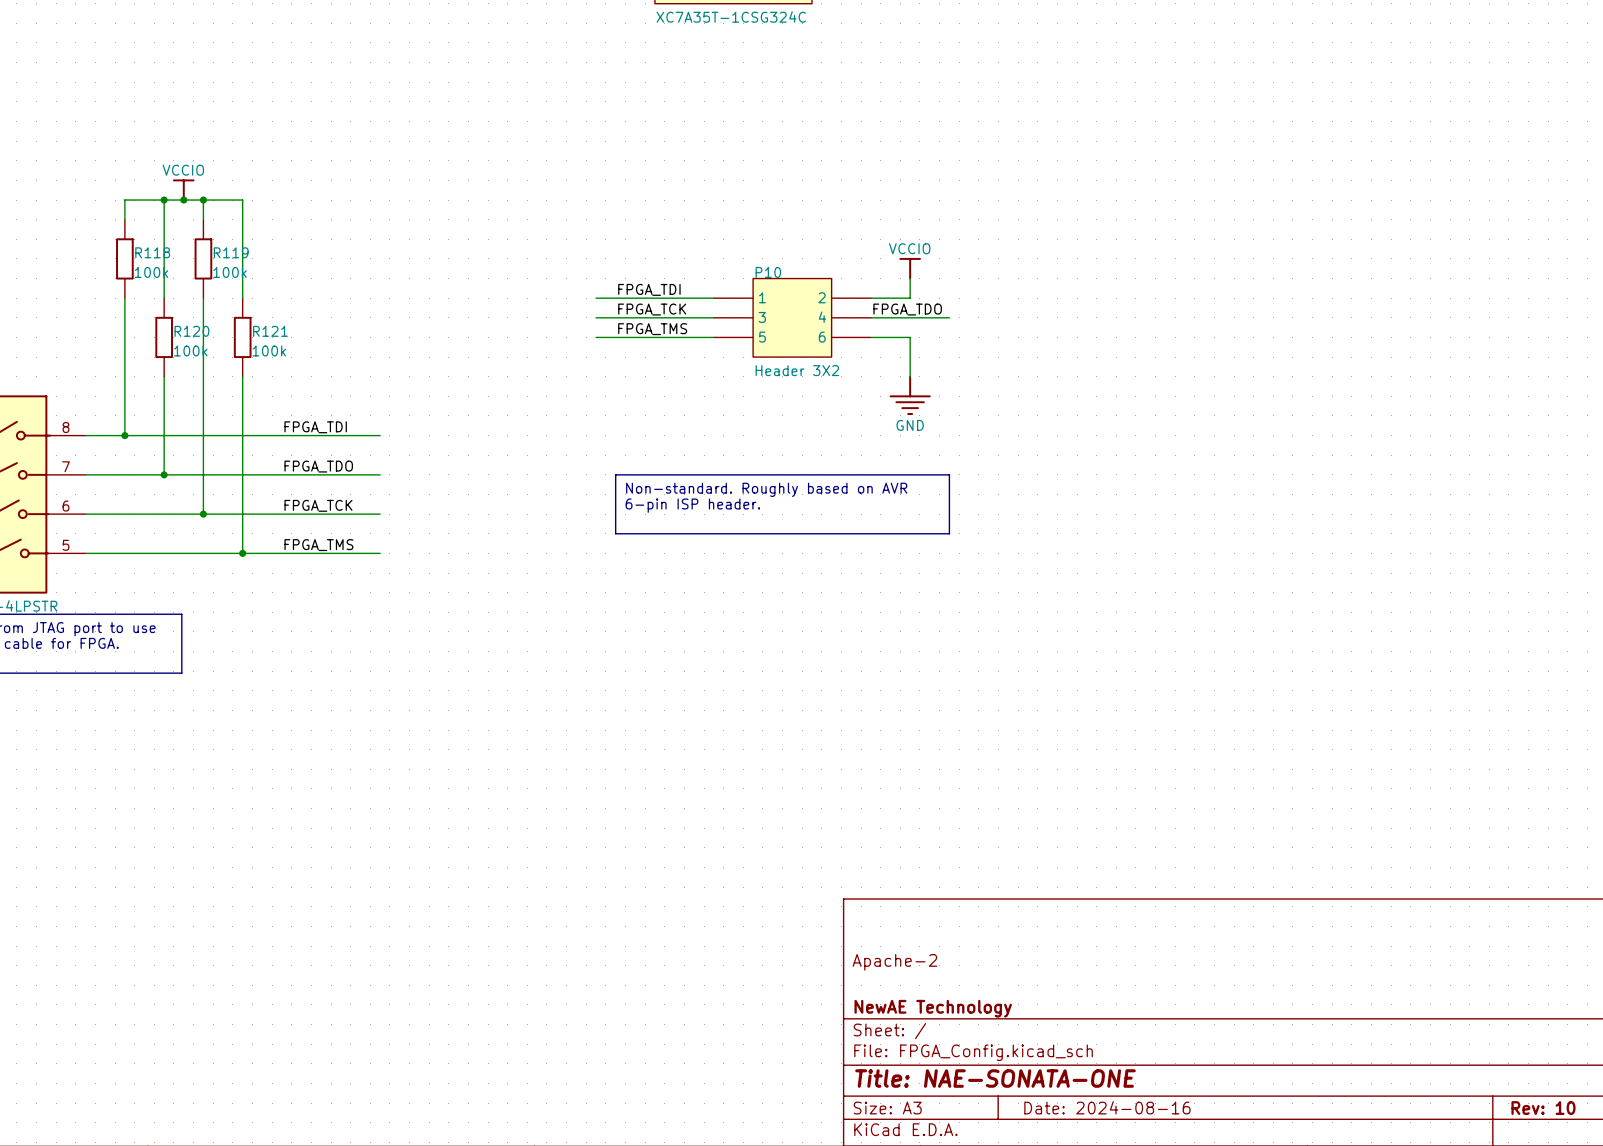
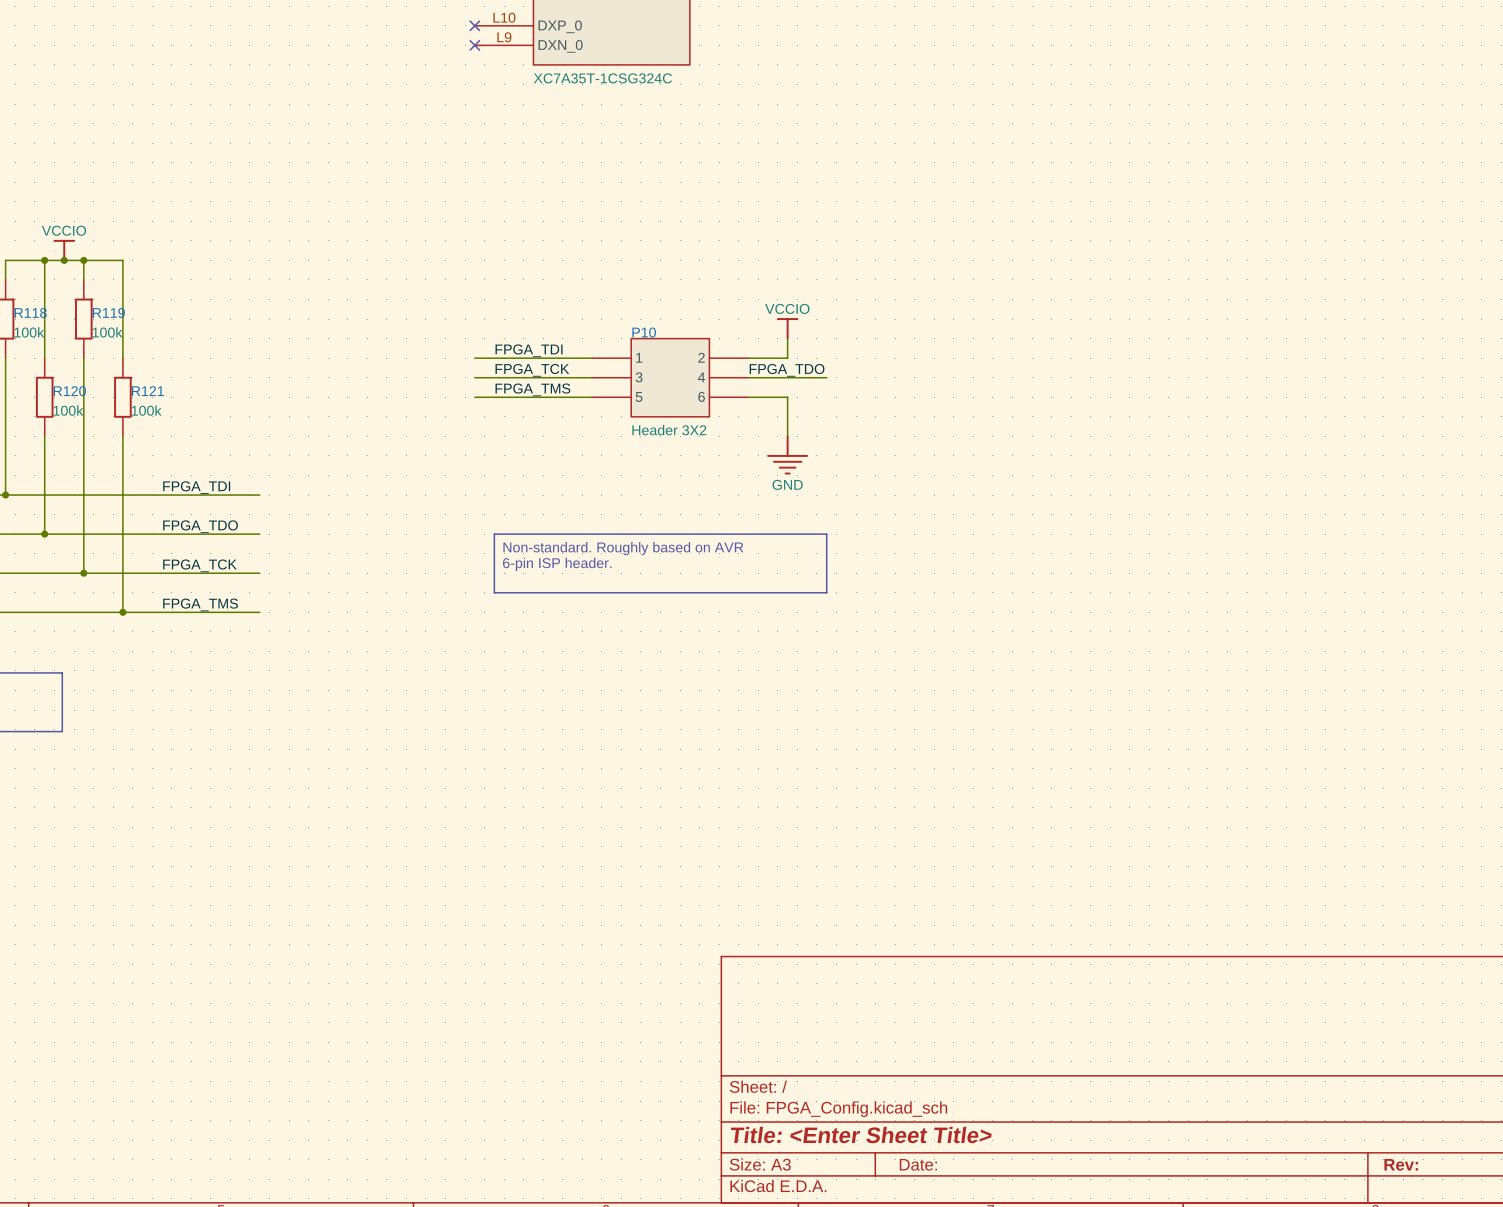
title block: Apache-2 (894, 962) -> none
title block: NewAE Technology (933, 1008) -> none
title block: Title: NAE-SONATA-ONE (995, 1078) -> Title: <Enter Sheet Title> (861, 1135)
title block: Date: 2024-08-16 (1107, 1107) -> Date: (918, 1164)
title block: Rev: 10 (1543, 1108) -> Rev: (1401, 1164)

